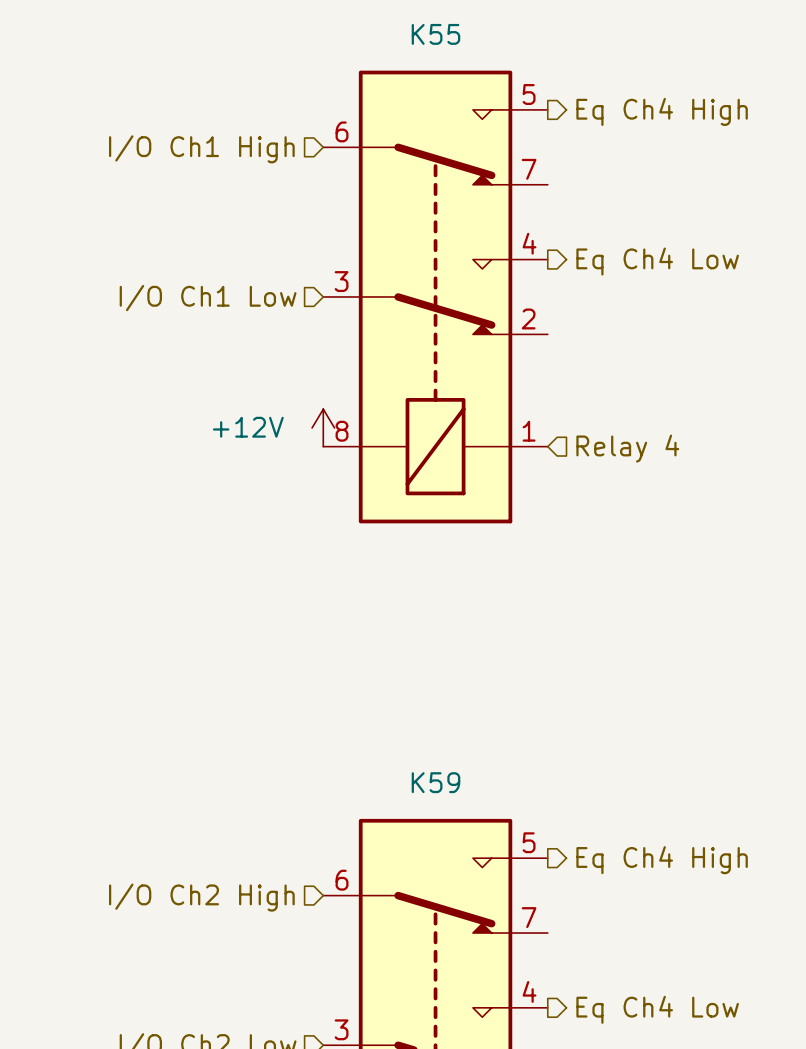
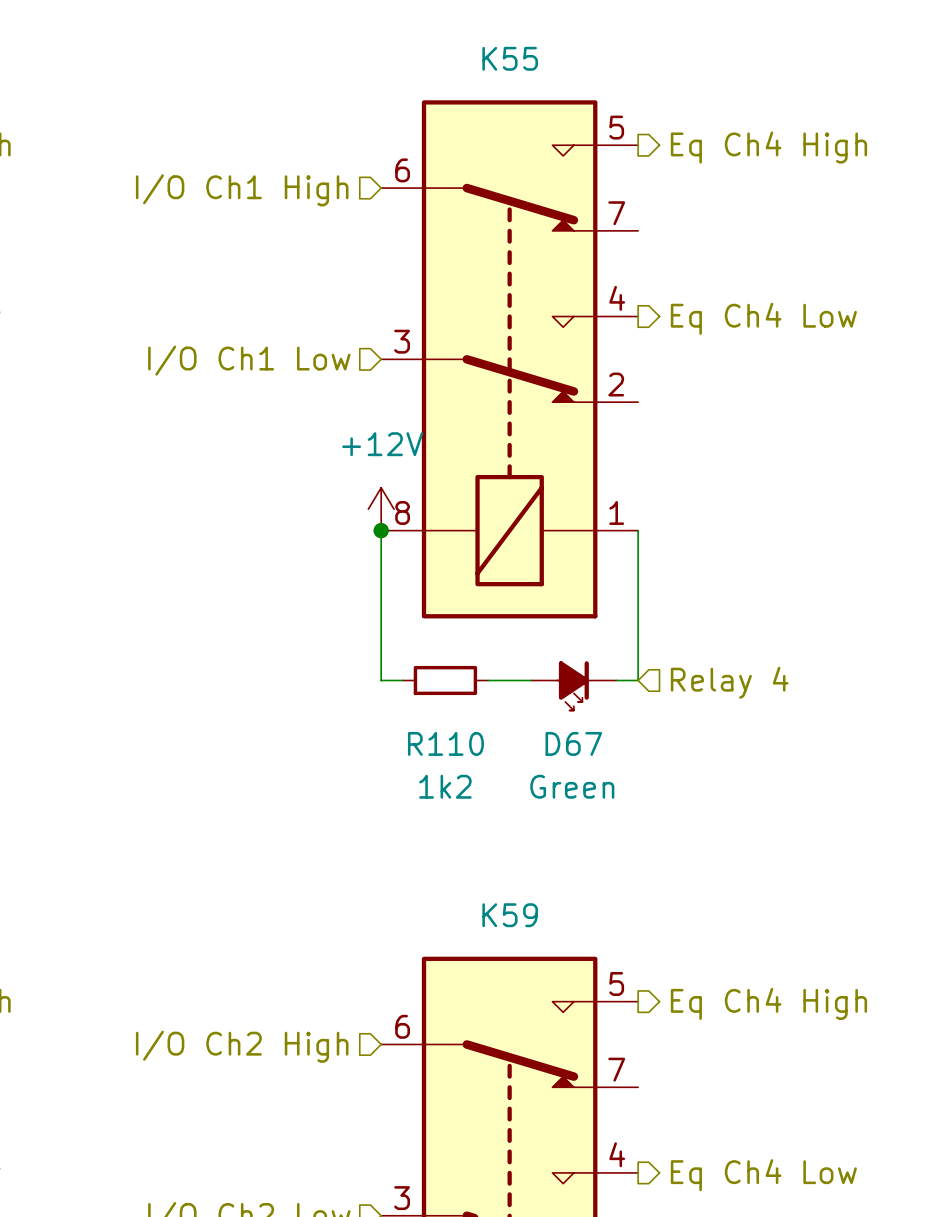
power symbol text position: +12V (248, 427) -> +12V (382, 444)
wire: none -> (381, 530) (381, 680) (402, 680)
junction: none -> (381, 530)
wire: none -> (638, 530) (638, 680) (616, 680)
hierarchical label position: Relay 4 (627, 448) -> Relay 4 (729, 682)
R110: none -> 1k2 (445, 680)
wire: none -> (488, 680) (531, 680)
D67: none -> Green (573, 685)

